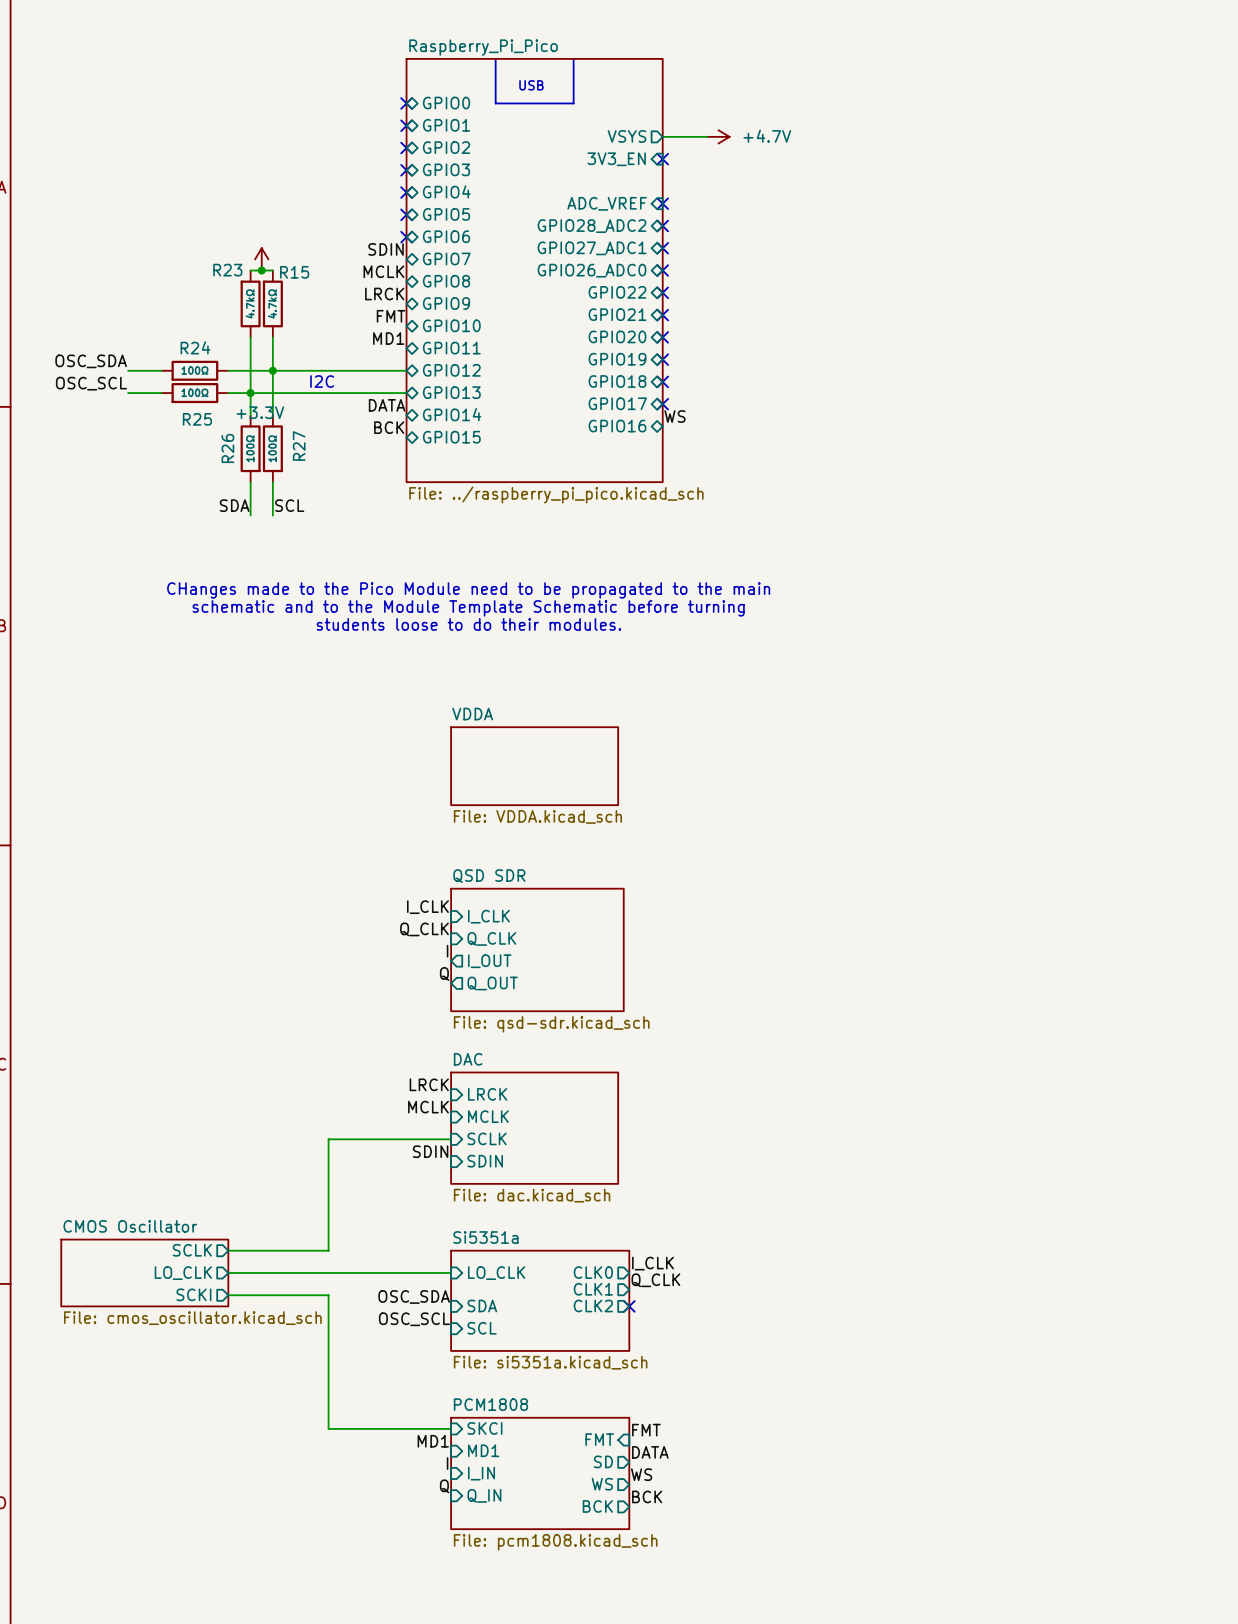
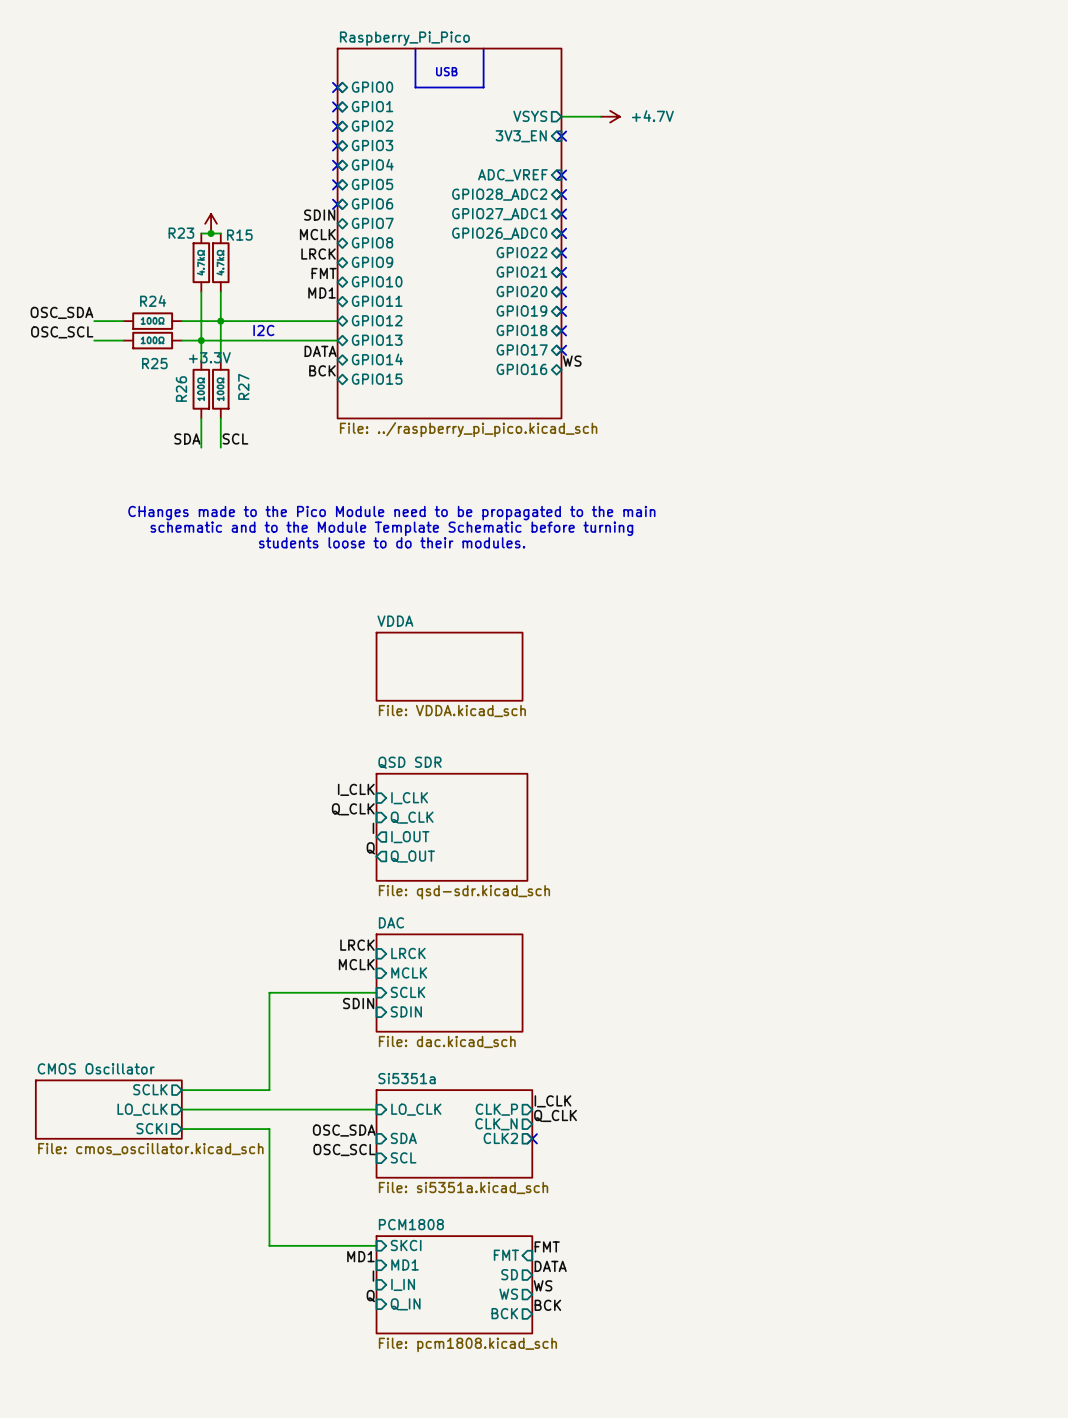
sheet pin: CLK0 (593, 1272) -> CLK_P (496, 1109)
sheet pin: CLK1 (593, 1289) -> CLK_N (496, 1124)

